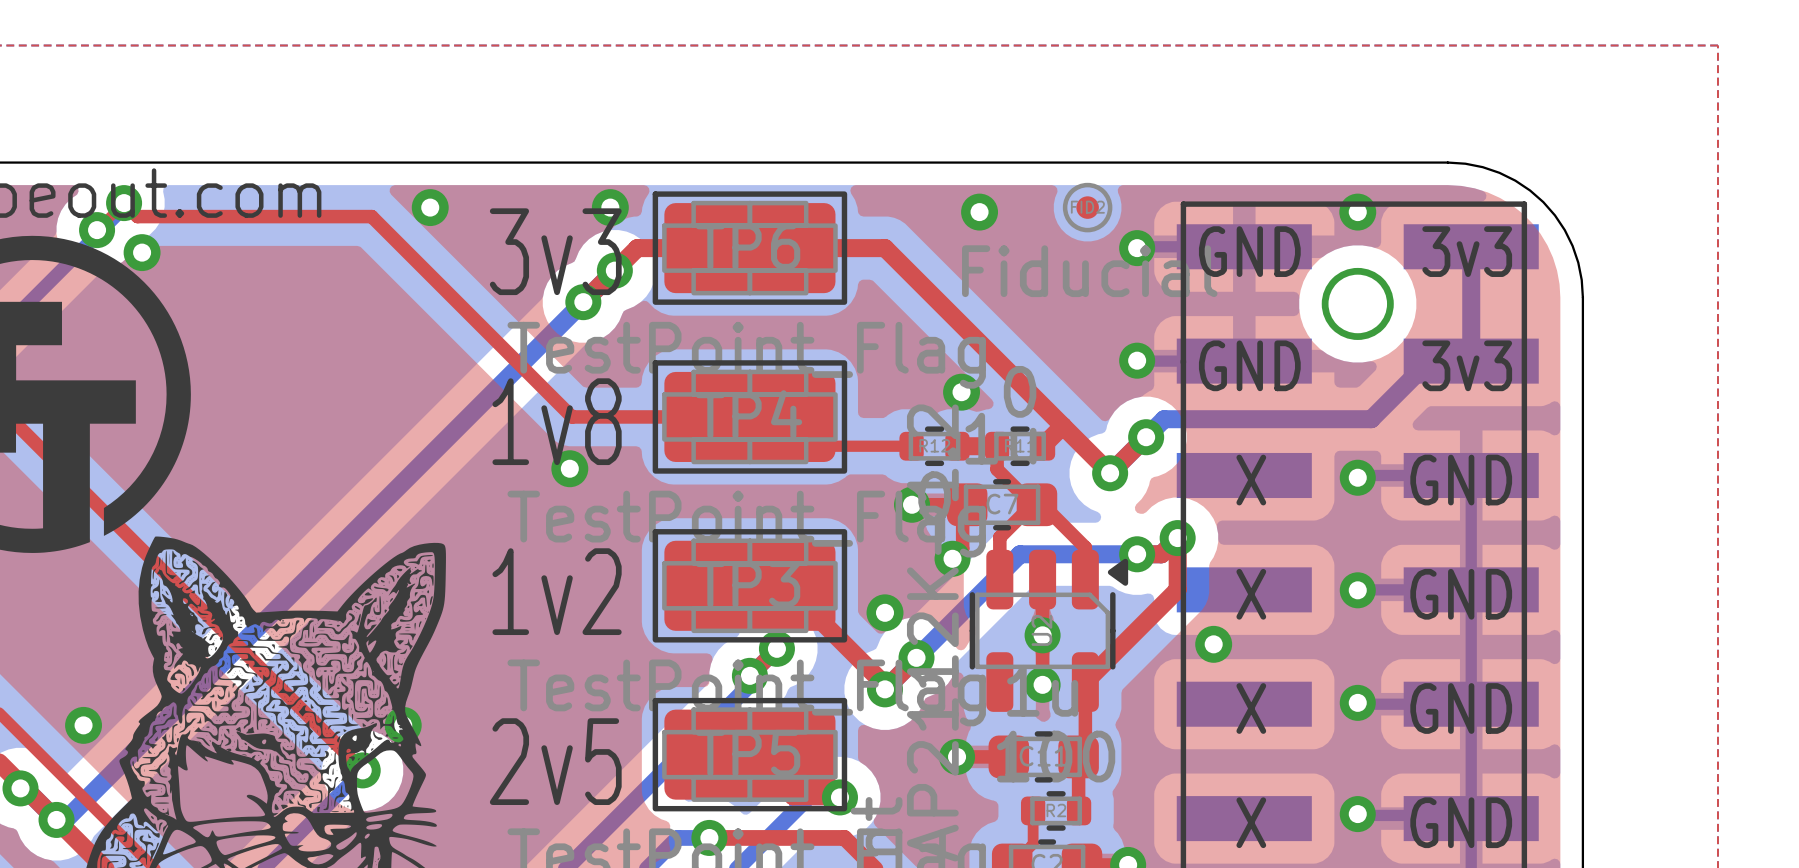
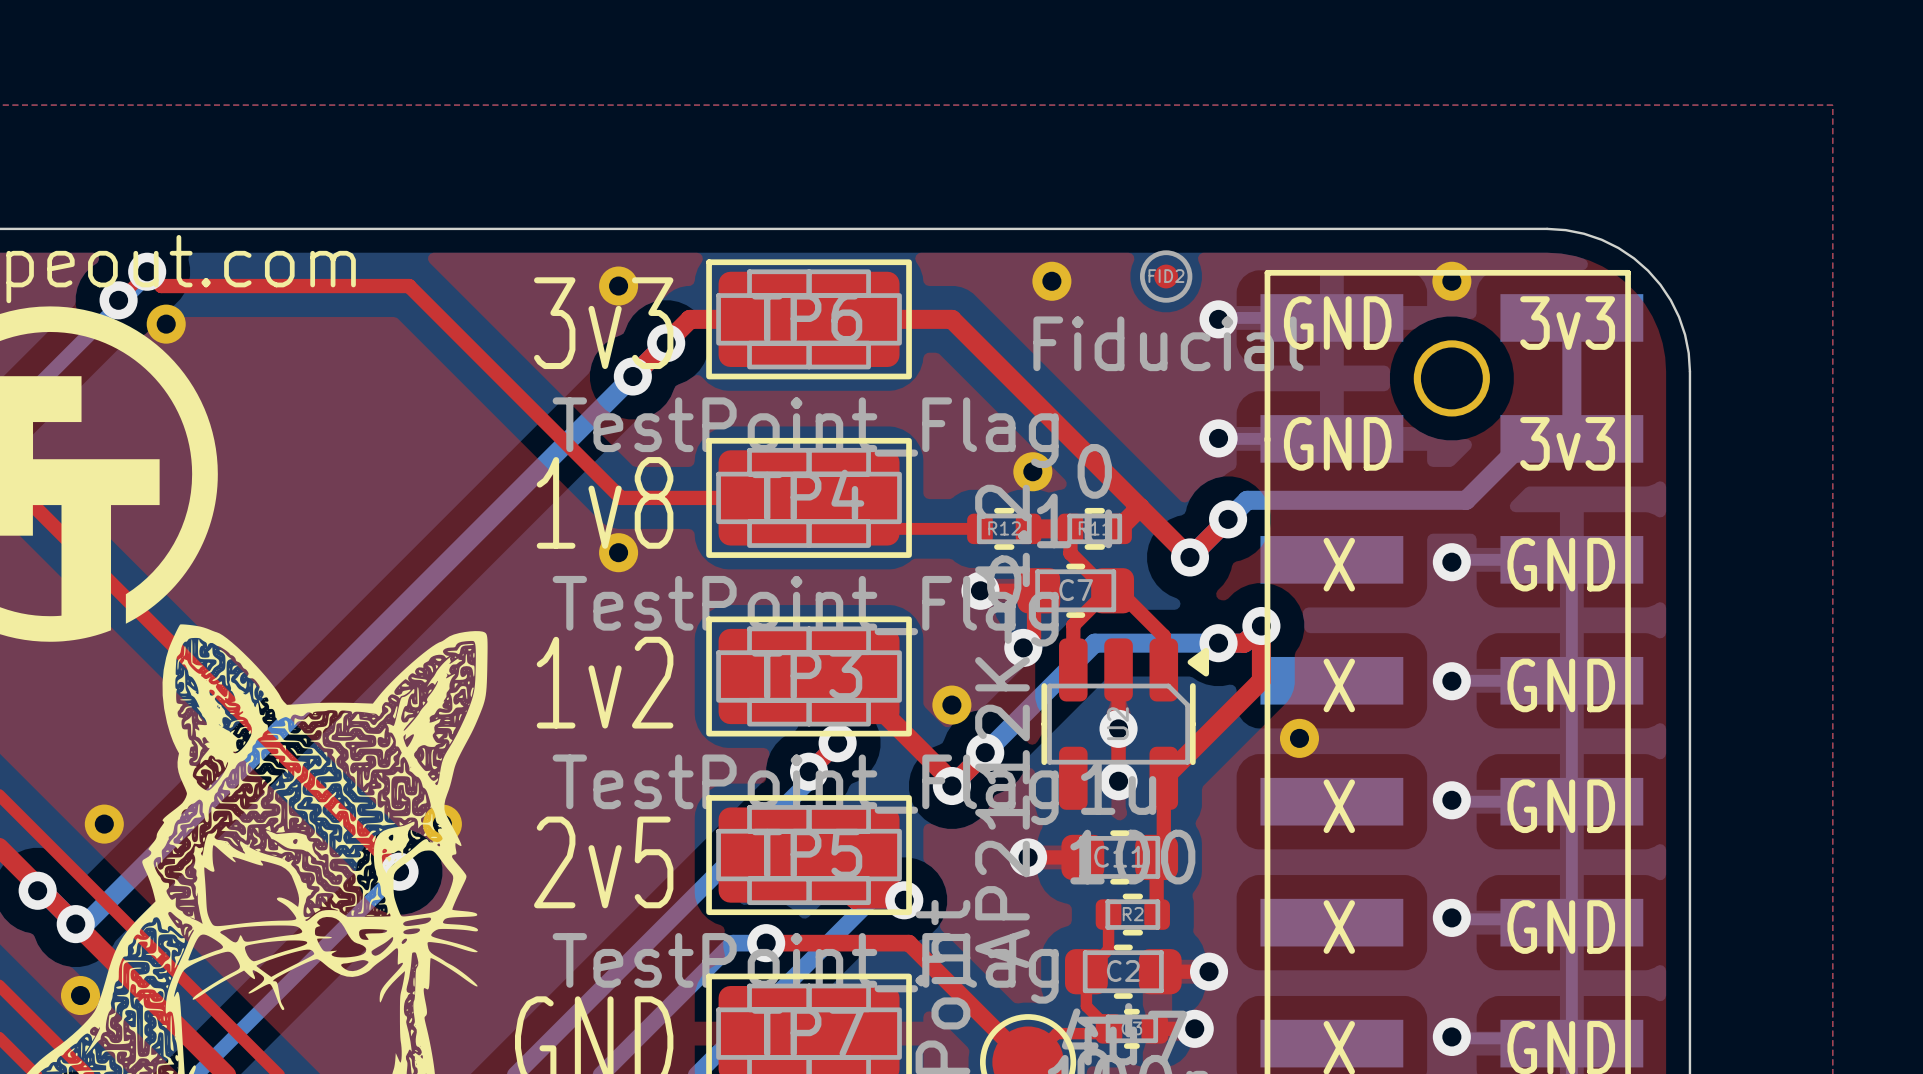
part: (430, 207) -> none
part position: (610, 207) -> (618, 286)

